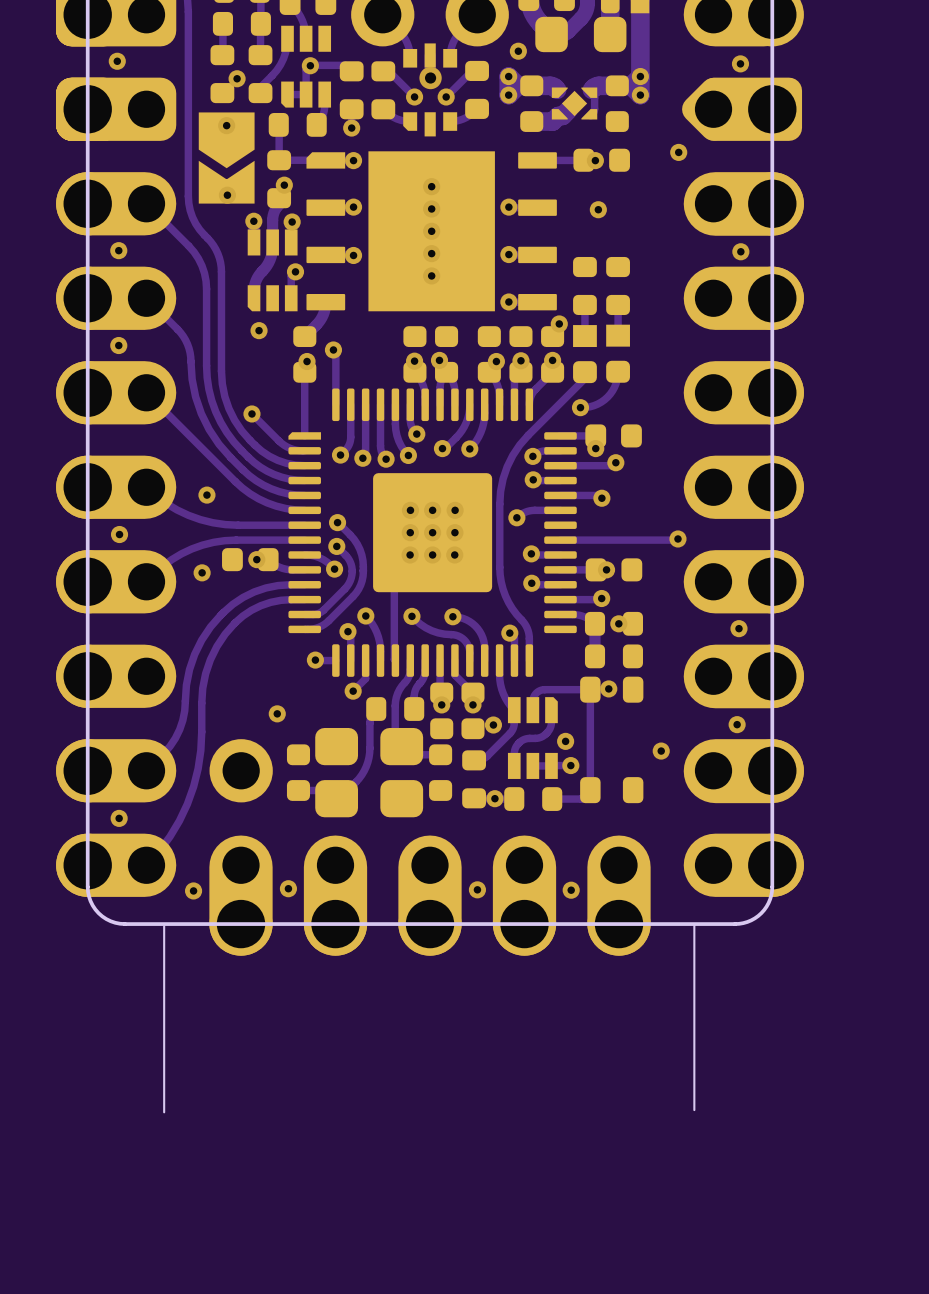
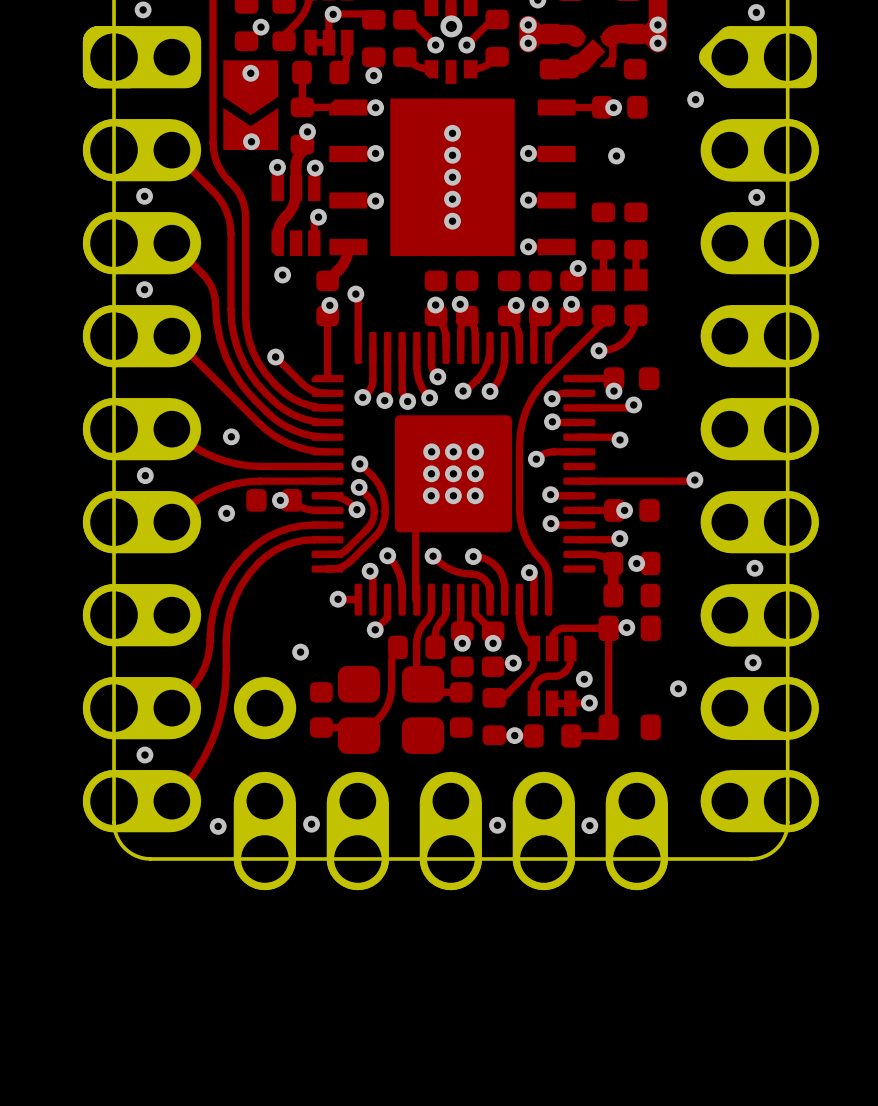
board edge: (694, 924) (694, 1110) -> none
board edge: (164, 926) (164, 1112) -> none

